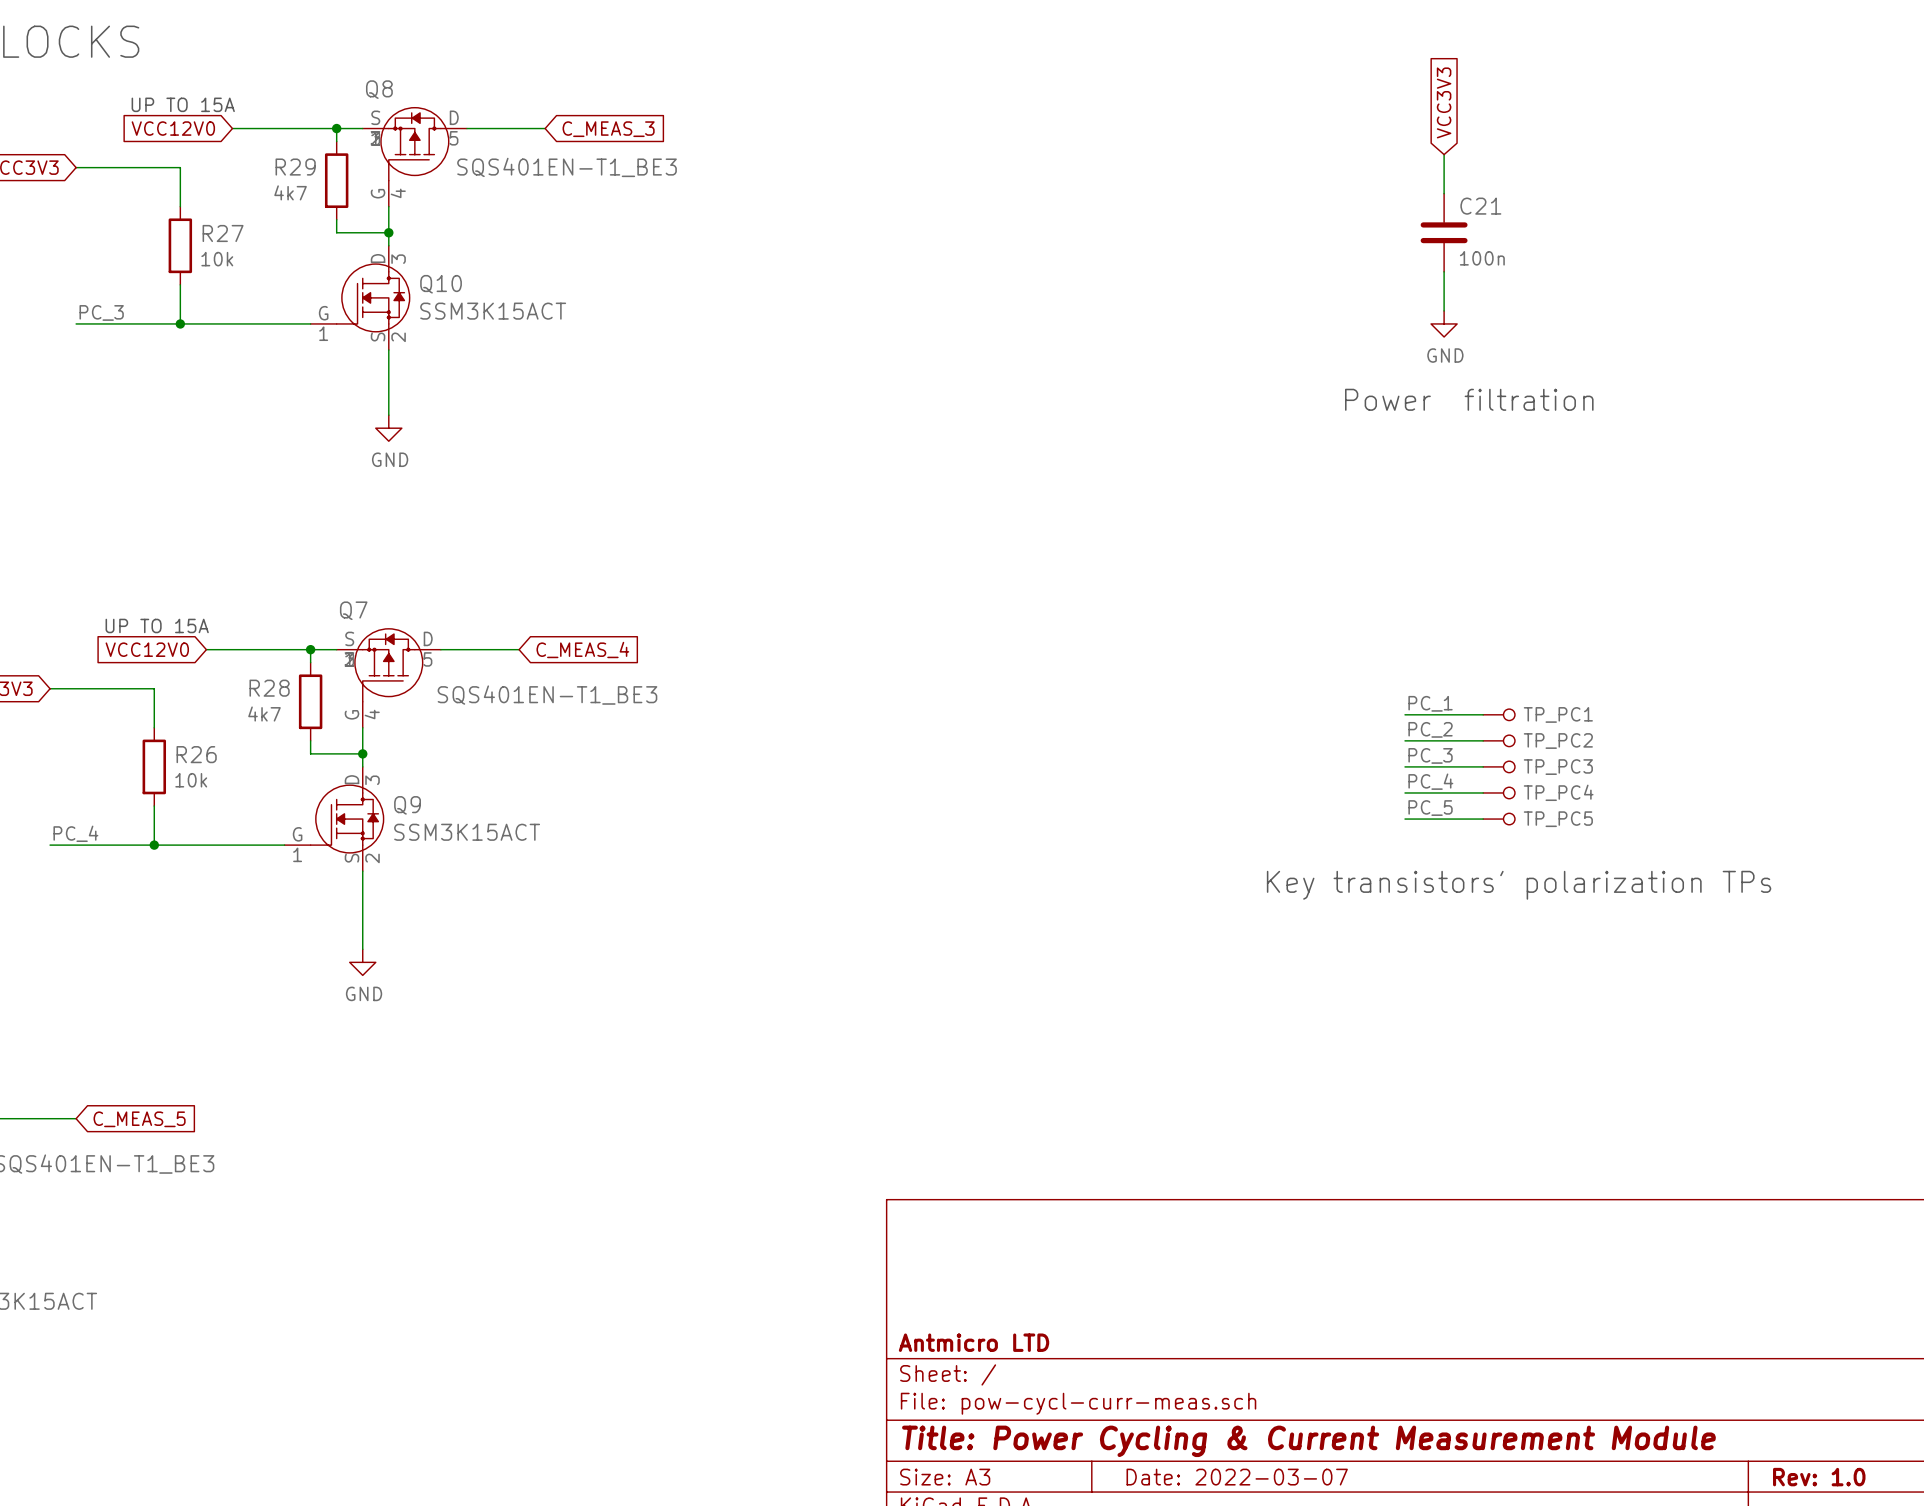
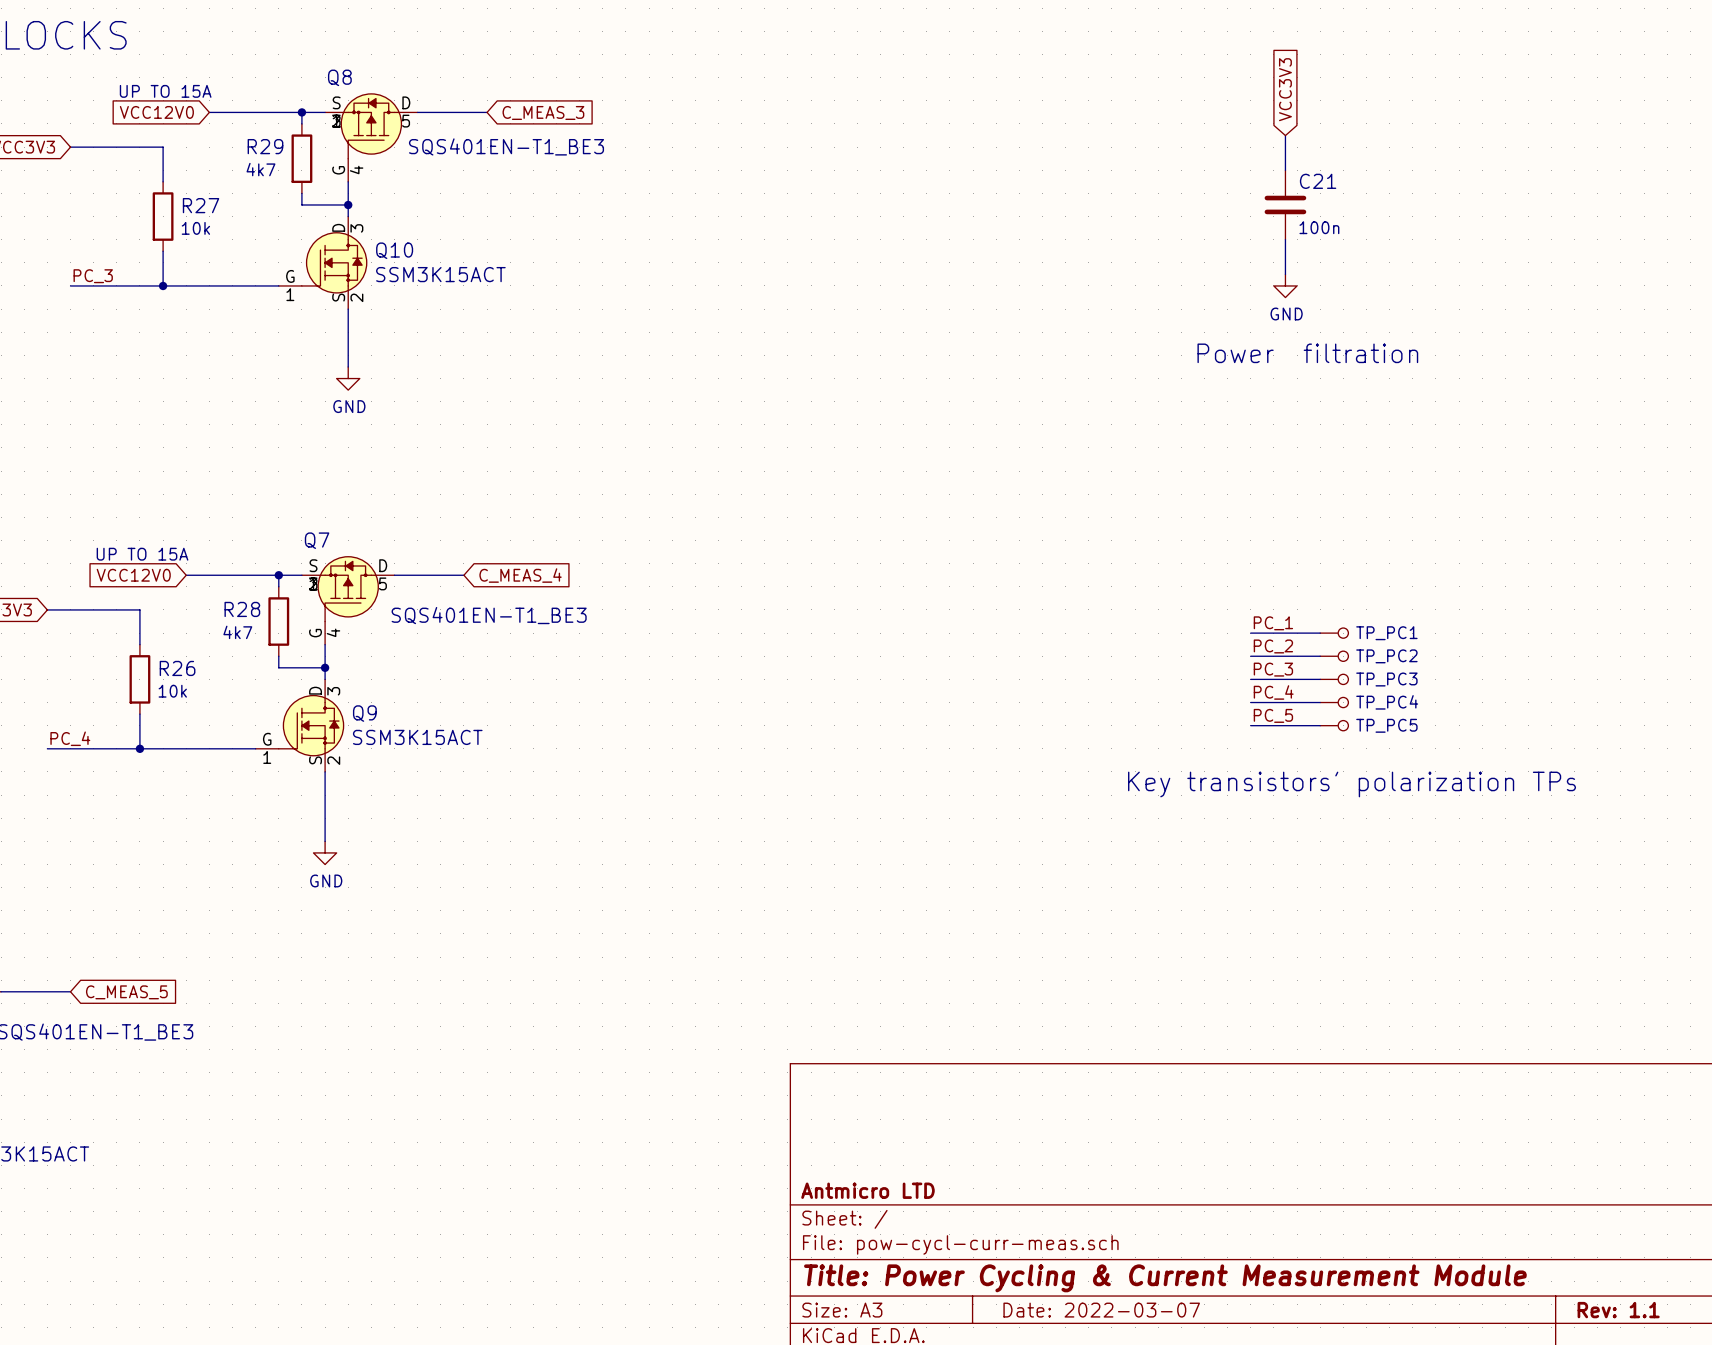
title block: Rev: 1.0 (1819, 1477) -> Rev: 1.1 (1618, 1310)

